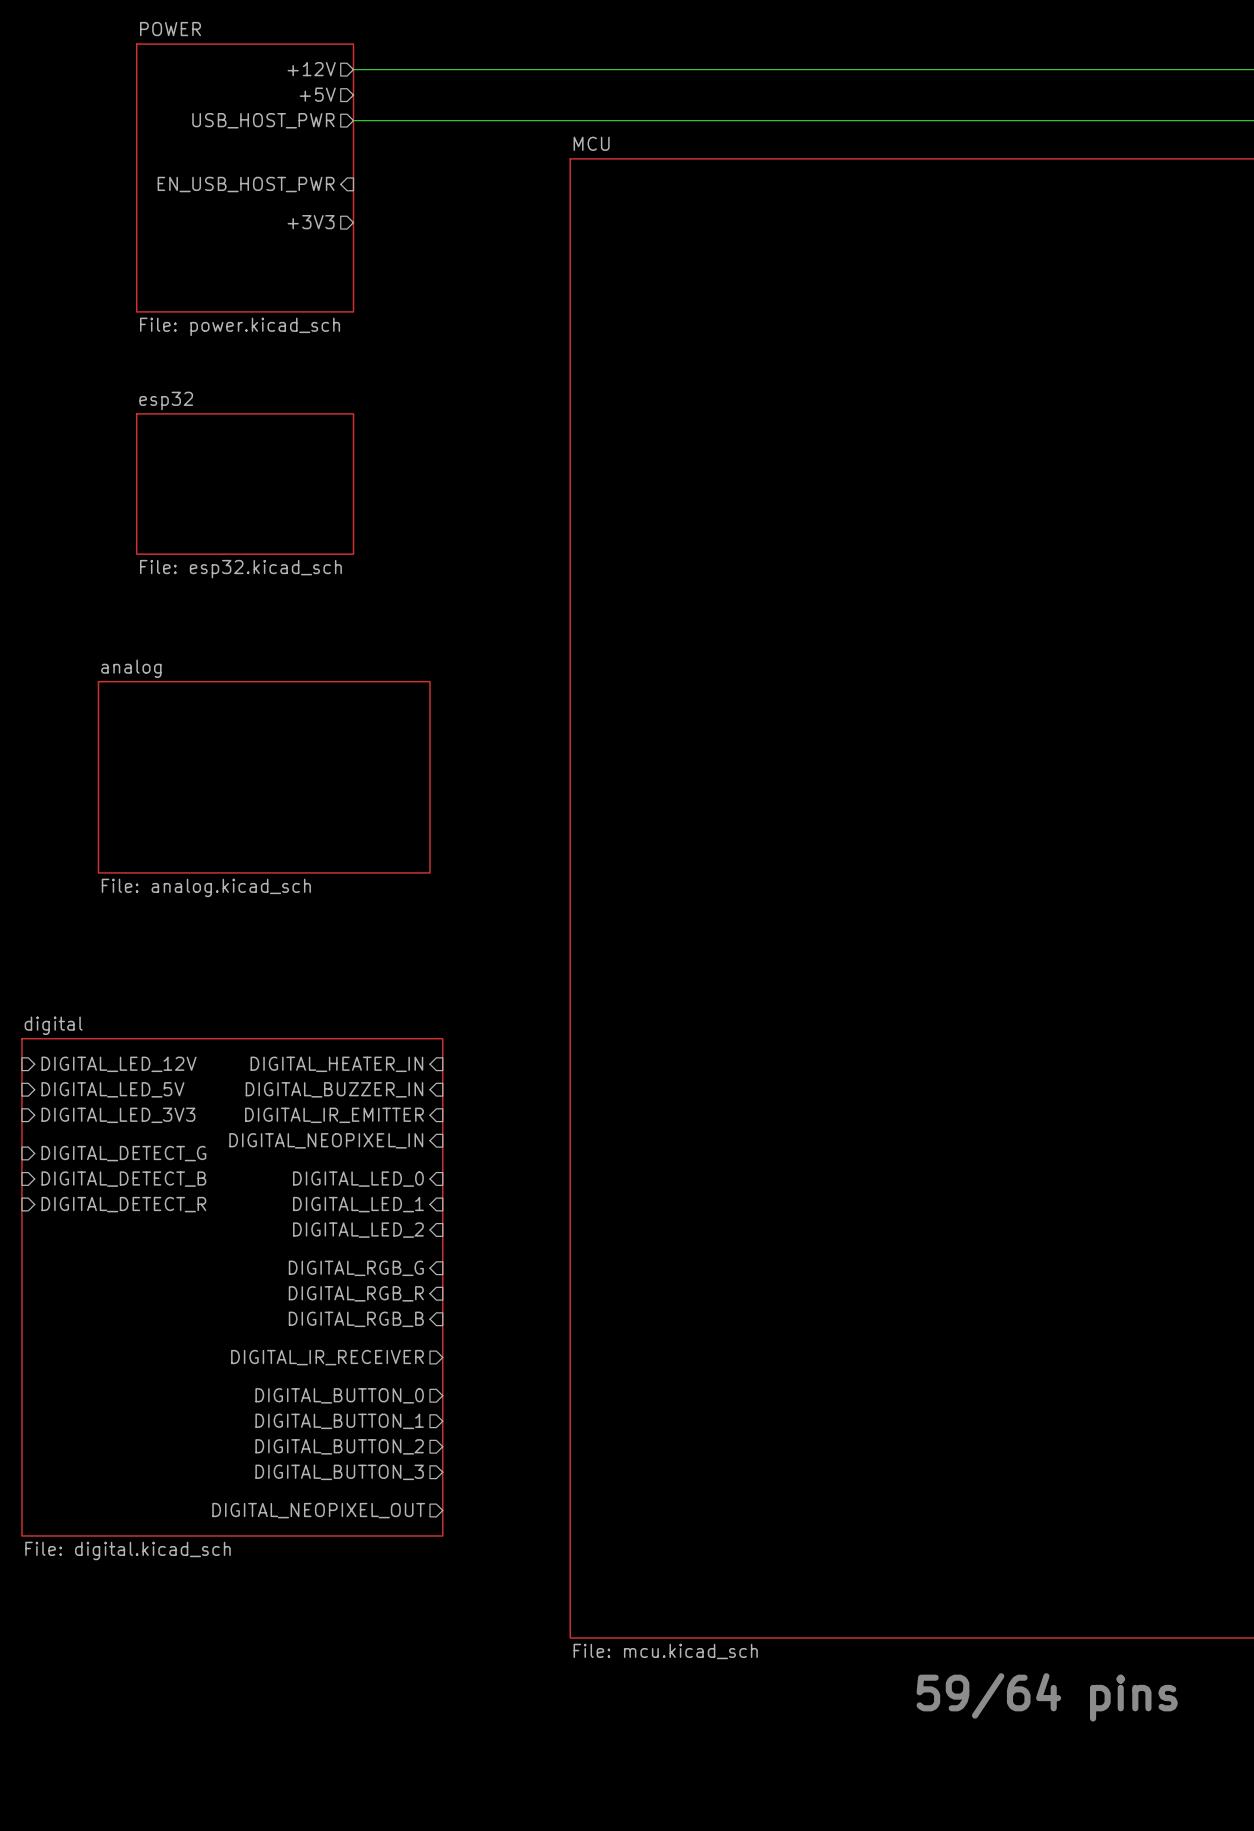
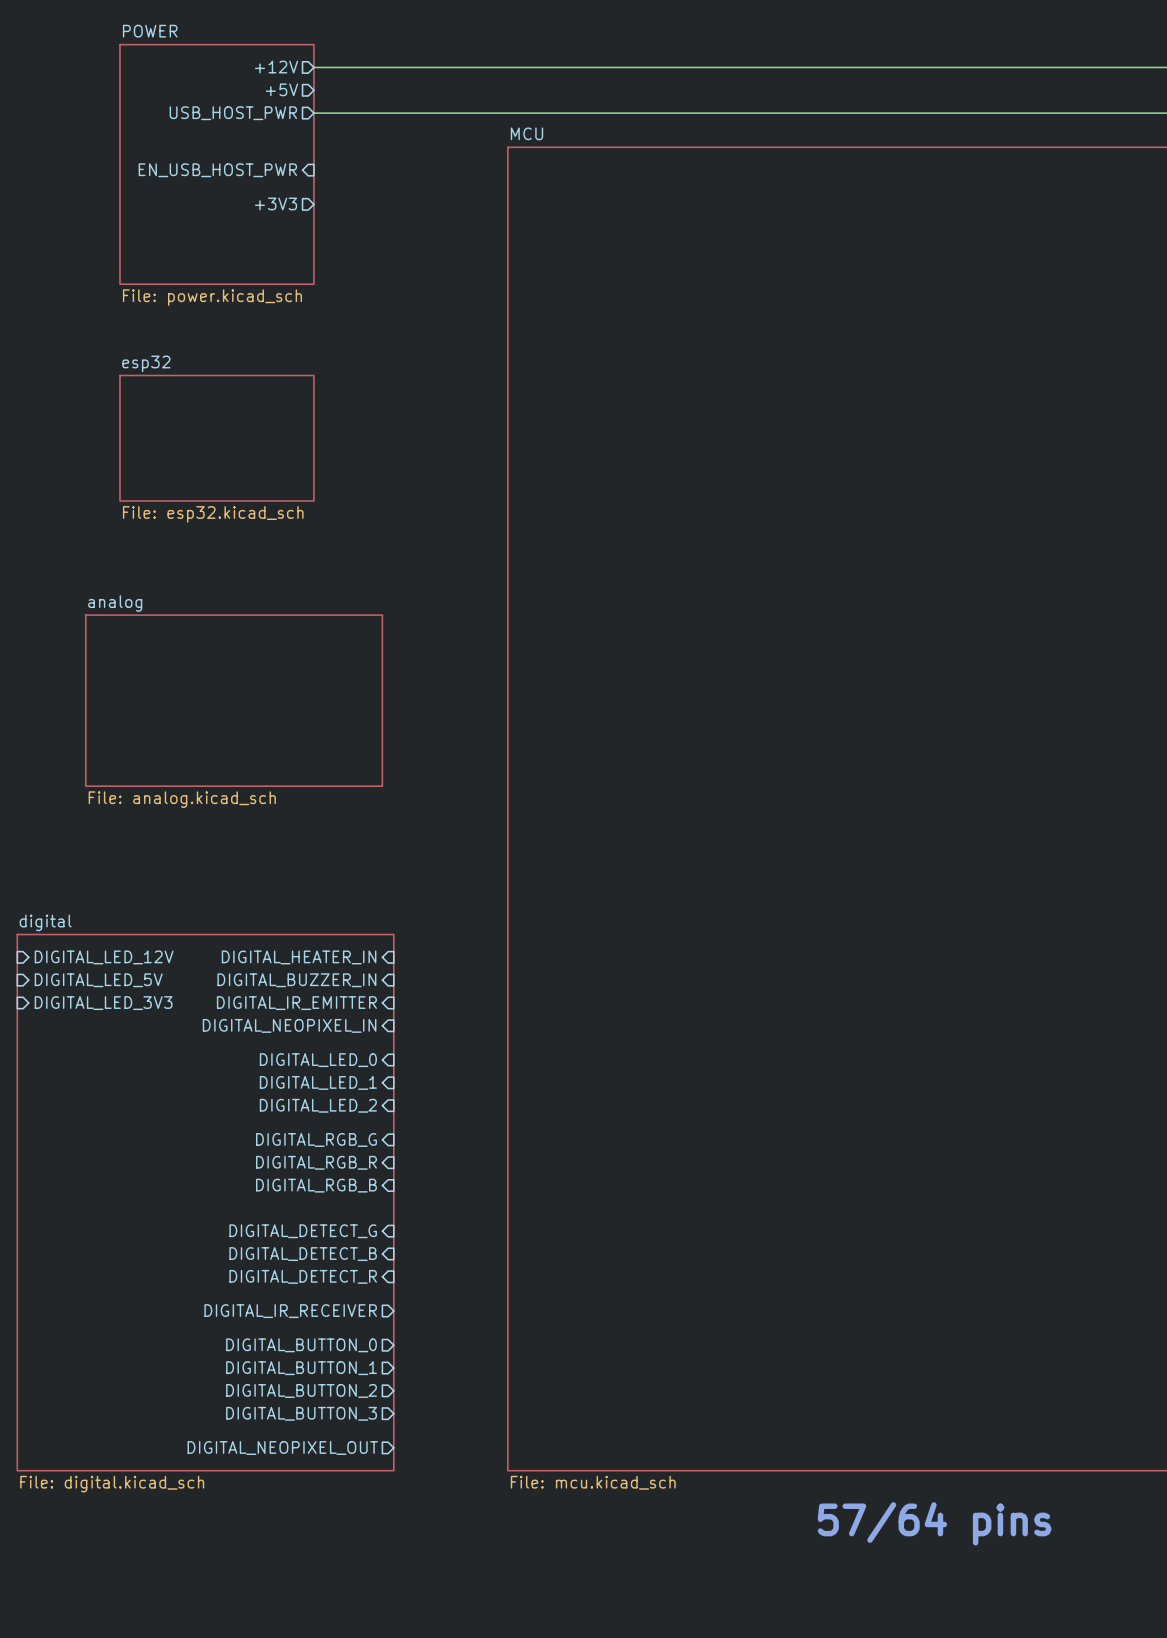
sheet pin: DIGITAL_DETECT_G (123, 1153) -> none
sheet pin: DIGITAL_DETECT_B (123, 1179) -> none
sheet pin: DIGITAL_DETECT_R (123, 1204) -> none
sheet digital: File: digital.kicad_sch (232, 1287) -> none
sheet digital: none -> File: digital.kicad_sch (205, 1202)
sheet pin position: DIGITAL_IR_RECEIVER (327, 1357) -> DIGITAL_IR_RECEIVER (290, 1311)
sheet pin: none -> DIGITAL_DETECT_G (303, 1231)
sheet pin shape: output (339, 1395) -> input (303, 1254)
sheet pin: DIGITAL_BUTTON_0 (339, 1395) -> DIGITAL_DETECT_B (303, 1254)
sheet pin shape: output (339, 1421) -> input (303, 1276)
sheet pin: DIGITAL_BUTTON_1 (339, 1421) -> DIGITAL_DETECT_R (303, 1276)
sheet pin position: DIGITAL_BUTTON_2 (339, 1446) -> DIGITAL_BUTTON_2 (301, 1390)
sheet pin position: DIGITAL_BUTTON_3 (339, 1472) -> DIGITAL_BUTTON_3 (301, 1413)
sheet pin: none -> DIGITAL_BUTTON_0 (301, 1345)
sheet pin position: DIGITAL_NEOPIXEL_OUT (318, 1510) -> DIGITAL_NEOPIXEL_OUT (282, 1448)
sheet pin: none -> DIGITAL_BUTTON_1 (301, 1368)
text: 59/64 pins (1047, 1697) -> 57/64 pins (934, 1523)

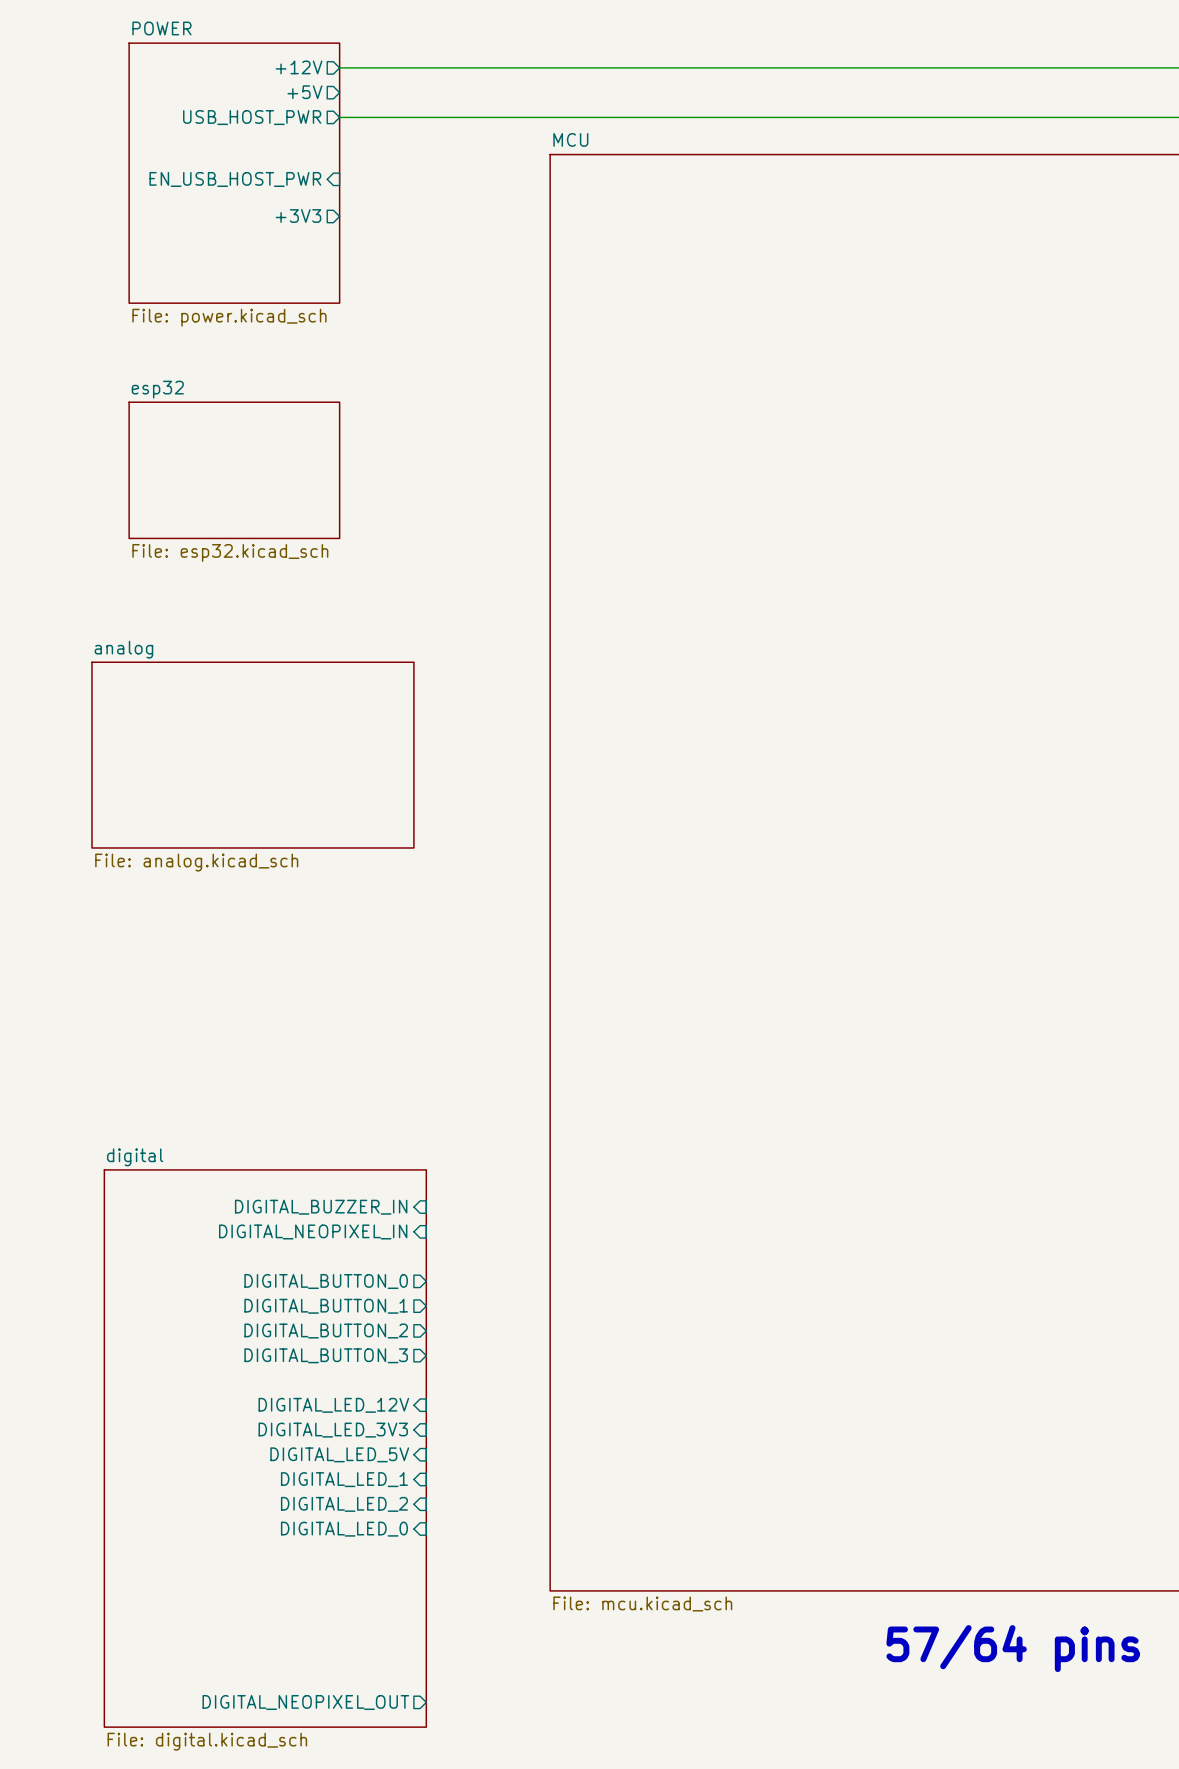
sheet pin: DIGITAL_LED_12V (104, 957) -> none
sheet pin: DIGITAL_HEATER_IN (299, 957) -> none
sheet pin: DIGITAL_LED_5V (98, 980) -> none
sheet pin position: DIGITAL_BUZZER_IN (296, 980) -> DIGITAL_BUZZER_IN (321, 1207)
sheet pin: DIGITAL_LED_3V3 (103, 1003) -> none
sheet pin: DIGITAL_IR_EMITTER (296, 1003) -> none
sheet pin: DIGITAL_NEOPIXEL_IN (289, 1025) -> none
sheet pin: DIGITAL_LED_0 (318, 1060) -> none
sheet pin: DIGITAL_LED_1 (318, 1082) -> none
sheet pin: DIGITAL_LED_2 (318, 1105) -> none
sheet pin: DIGITAL_RGB_G (316, 1139) -> DIGITAL_NEOPIXEL_IN (313, 1231)
sheet pin: DIGITAL_RGB_R (316, 1162) -> none
sheet pin shape: input (316, 1185) -> output (326, 1281)
sheet pin: DIGITAL_RGB_B (316, 1185) -> DIGITAL_BUTTON_0 (326, 1281)
sheet digital: File: digital.kicad_sch (205, 1202) -> none
sheet pin: none -> DIGITAL_BUTTON_1 (326, 1306)
sheet pin shape: input (303, 1231) -> output (326, 1331)
sheet pin: DIGITAL_DETECT_G (303, 1231) -> DIGITAL_BUTTON_2 (326, 1331)
sheet pin shape: input (303, 1254) -> output (326, 1355)
sheet pin: DIGITAL_DETECT_B (303, 1254) -> DIGITAL_BUTTON_3 (326, 1355)
sheet pin: DIGITAL_DETECT_R (303, 1276) -> DIGITAL_LED_12V (333, 1405)
sheet pin: DIGITAL_IR_RECEIVER (290, 1311) -> none
sheet pin: none -> DIGITAL_LED_3V3 (333, 1430)
sheet digital: none -> File: digital.kicad_sch (265, 1448)
sheet pin shape: output (301, 1345) -> input (339, 1454)
sheet pin: DIGITAL_BUTTON_0 (301, 1345) -> DIGITAL_LED_5V (339, 1454)
sheet pin shape: output (301, 1368) -> input (344, 1479)
sheet pin: DIGITAL_BUTTON_1 (301, 1368) -> DIGITAL_LED_1 (344, 1479)
sheet pin shape: output (301, 1390) -> input (344, 1504)
sheet pin: DIGITAL_BUTTON_2 (301, 1390) -> DIGITAL_LED_2 (344, 1504)
sheet pin shape: output (301, 1413) -> input (344, 1529)
sheet pin: DIGITAL_BUTTON_3 (301, 1413) -> DIGITAL_LED_0 (344, 1529)
sheet pin position: DIGITAL_NEOPIXEL_OUT (282, 1448) -> DIGITAL_NEOPIXEL_OUT (305, 1702)

